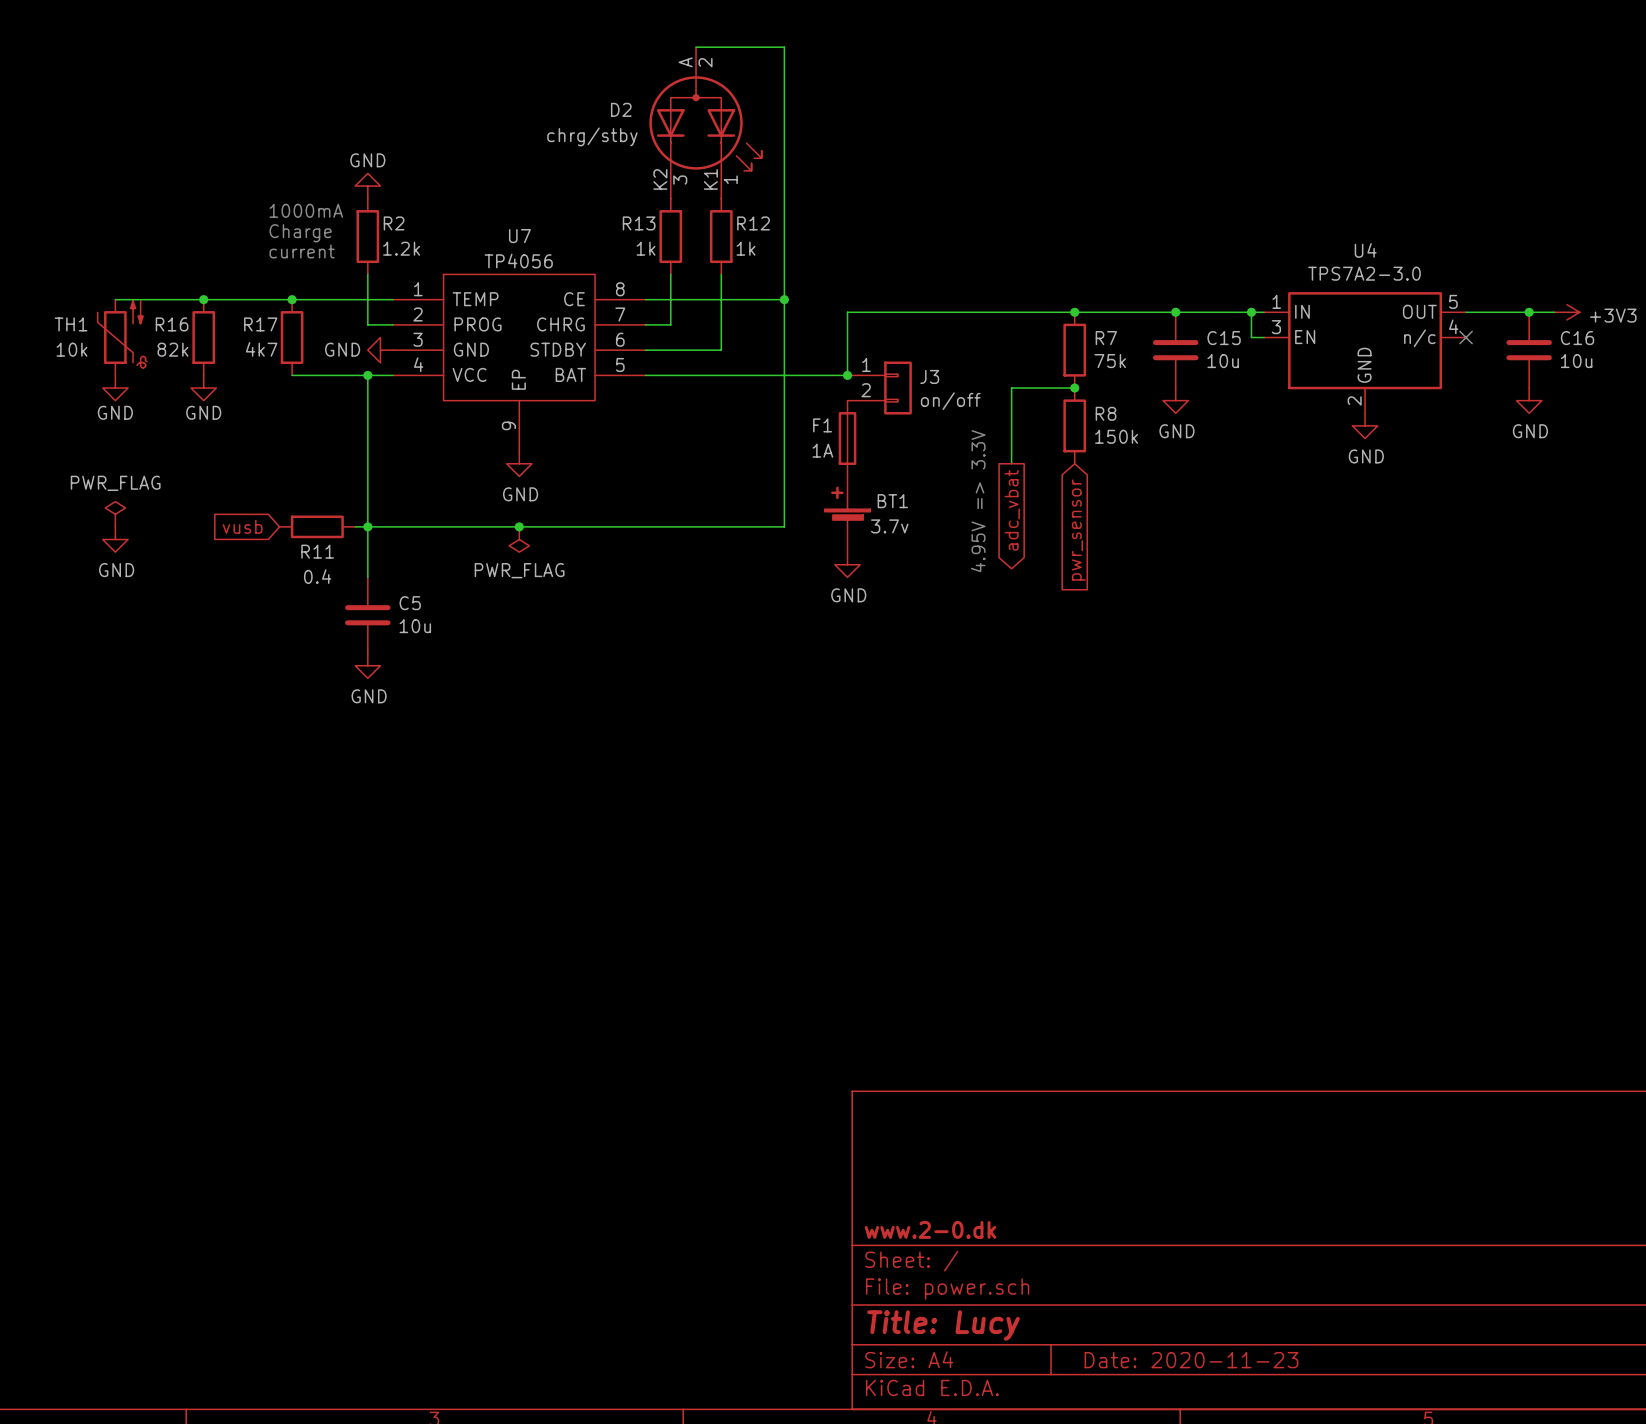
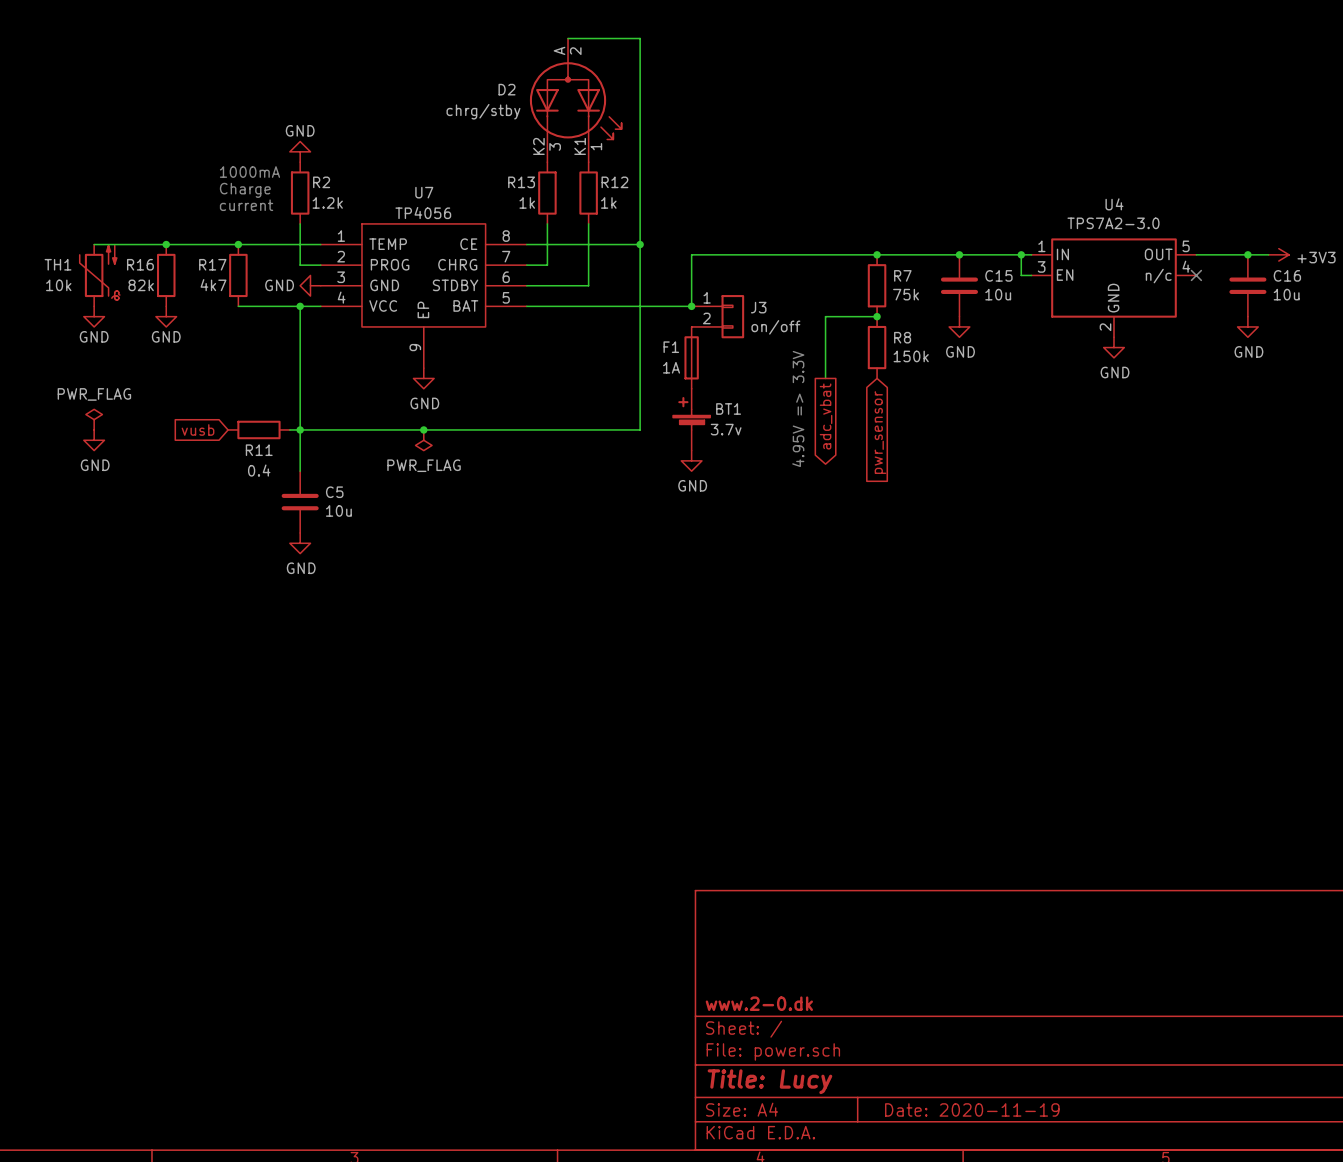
title block: Date: 2020-11-23 (1191, 1360) -> Date: 2020-11-19 (972, 1109)

